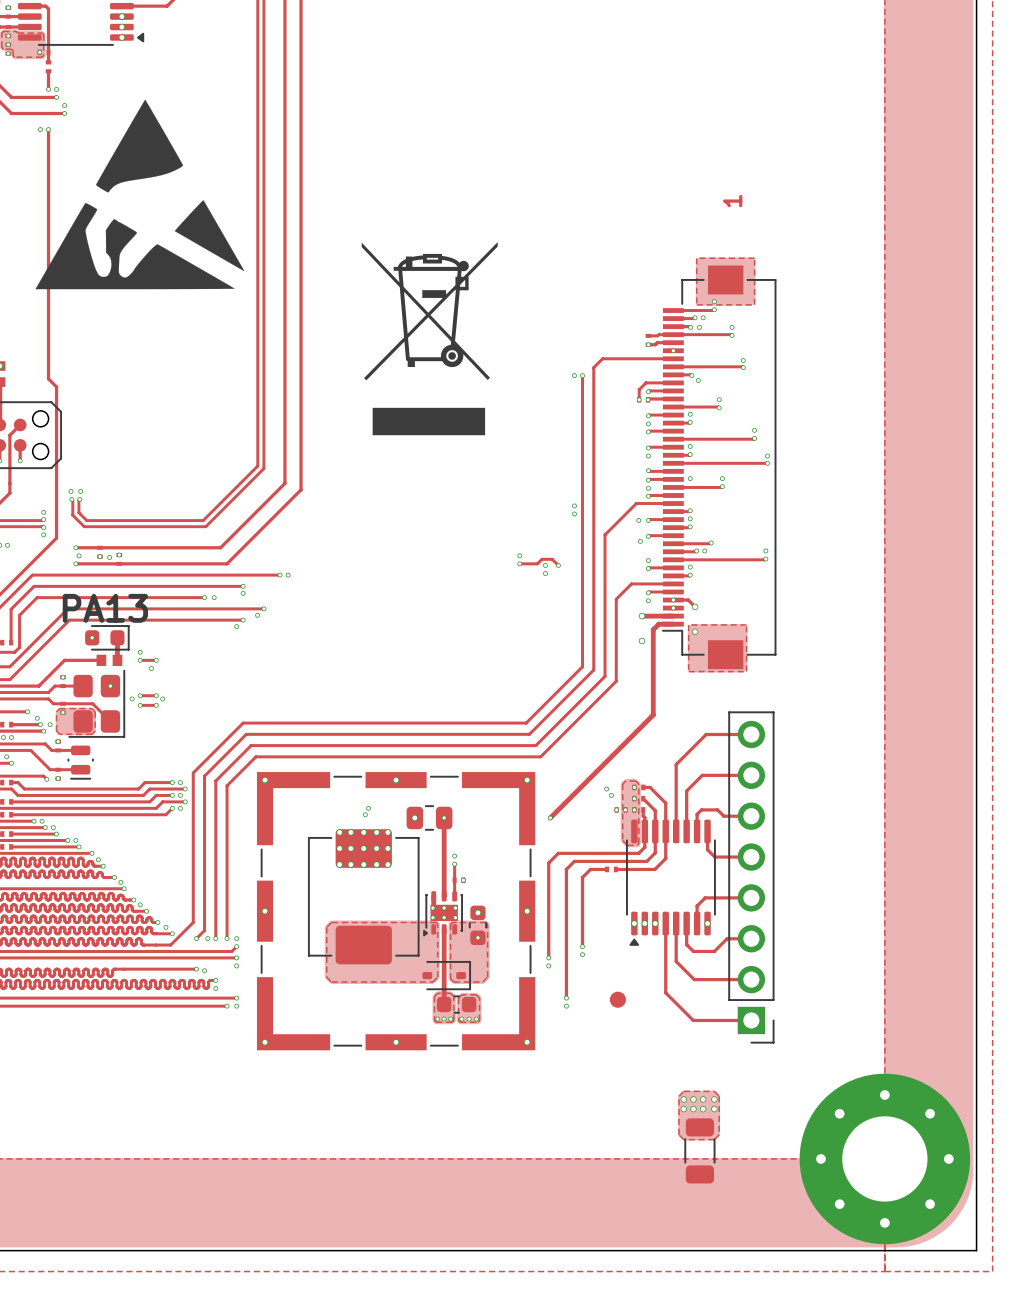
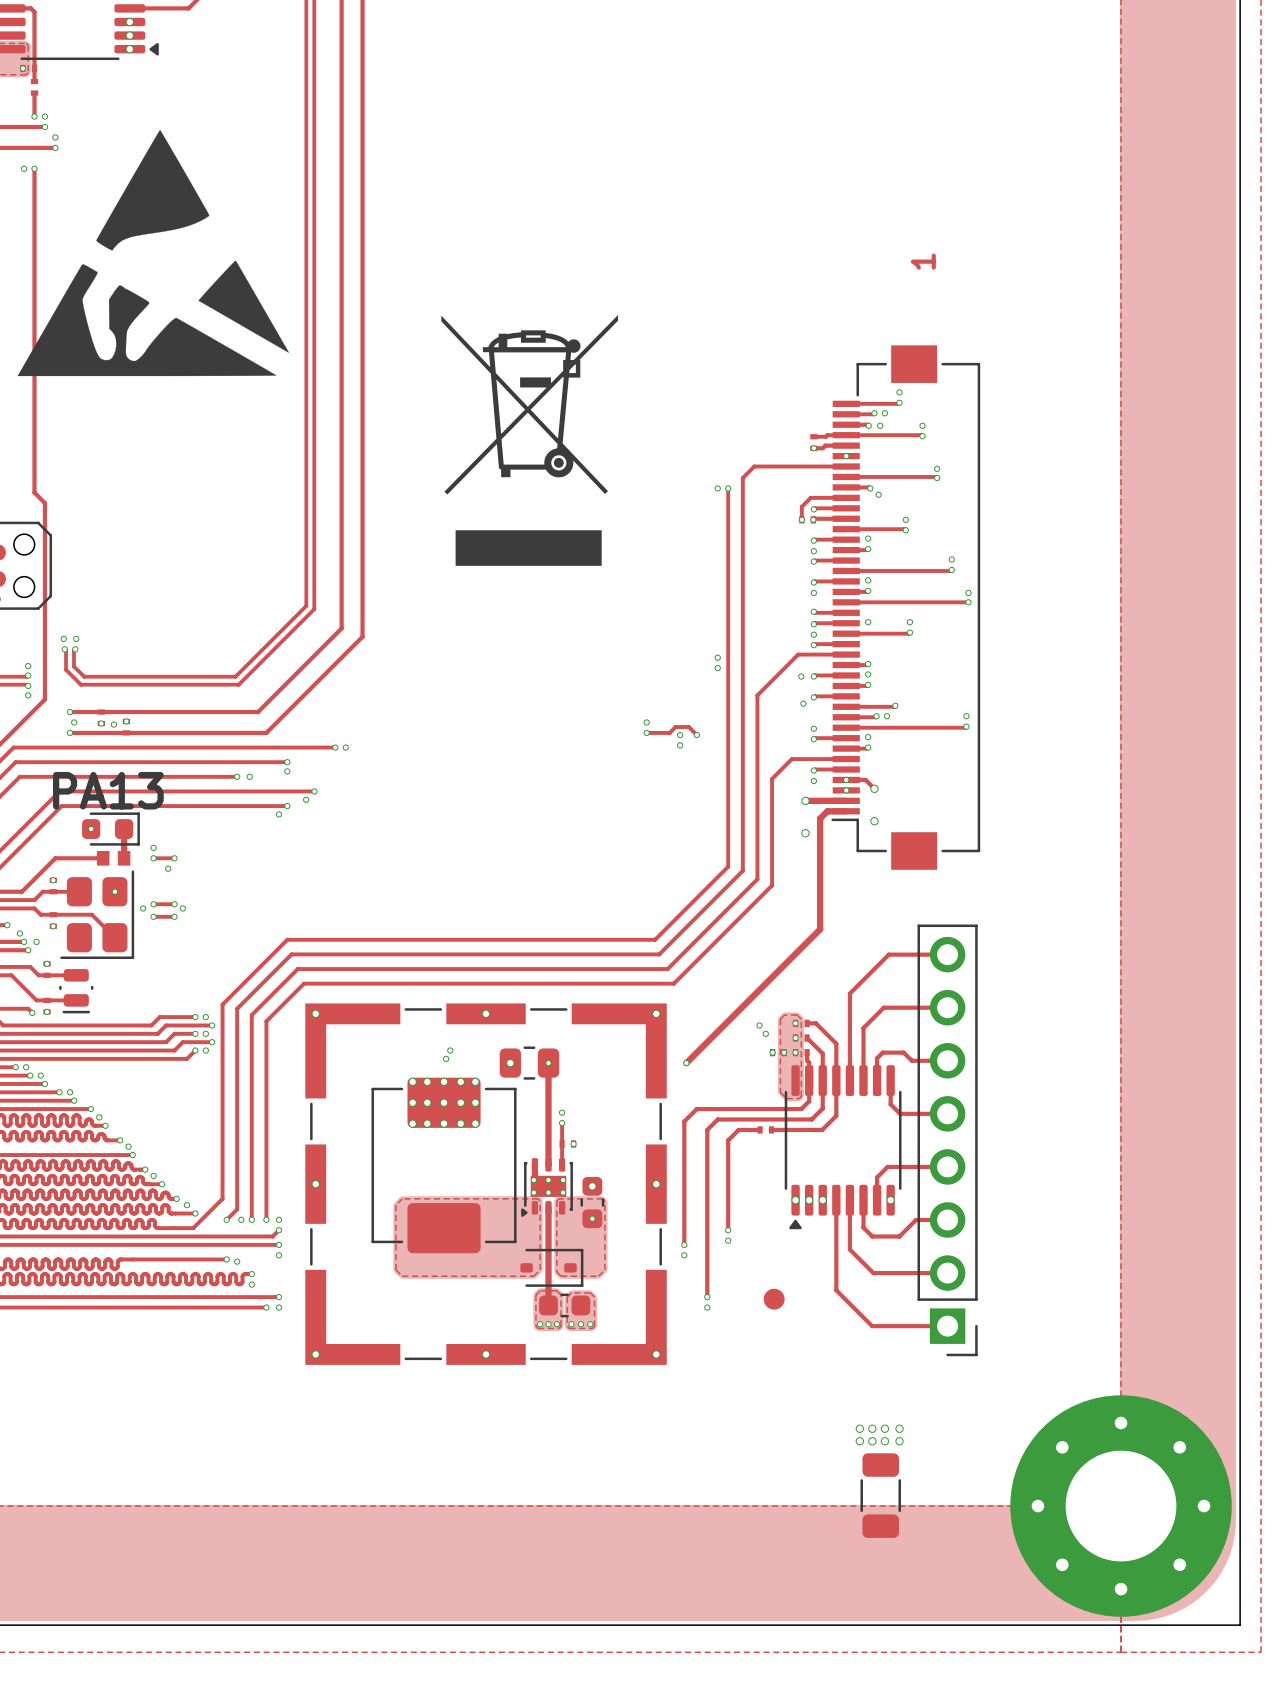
zone outline: (696, 258) (696, 304) (754, 304) (754, 258) (696, 258) -> none
zone outline: (688, 624) (688, 671) (746, 671) (746, 624) (688, 624) -> none
zone outline: (59, 708) (56, 711) (56, 731) (59, 734) (91, 734) (95, 731) (95, 711) (91, 708) (59, 708) -> none
zone outline: (683, 1091) (679, 1096) (679, 1134) (683, 1139) (714, 1139) (719, 1134) (719, 1096) (714, 1091) (683, 1091) -> none

